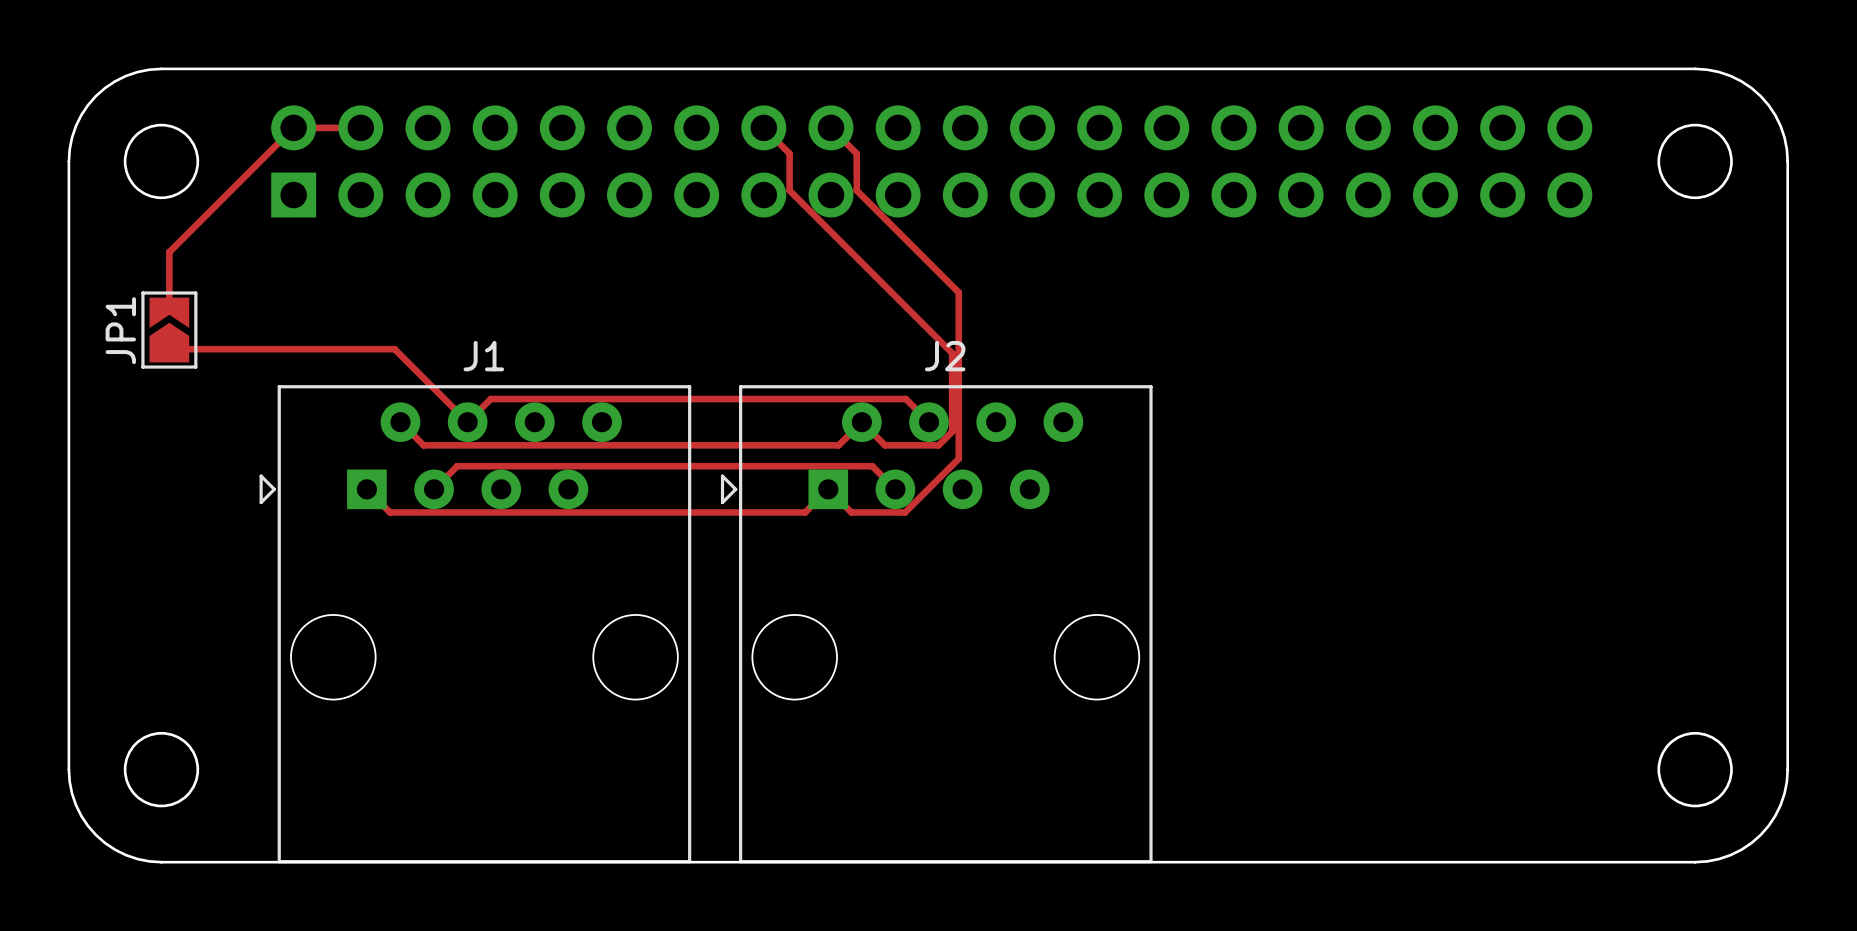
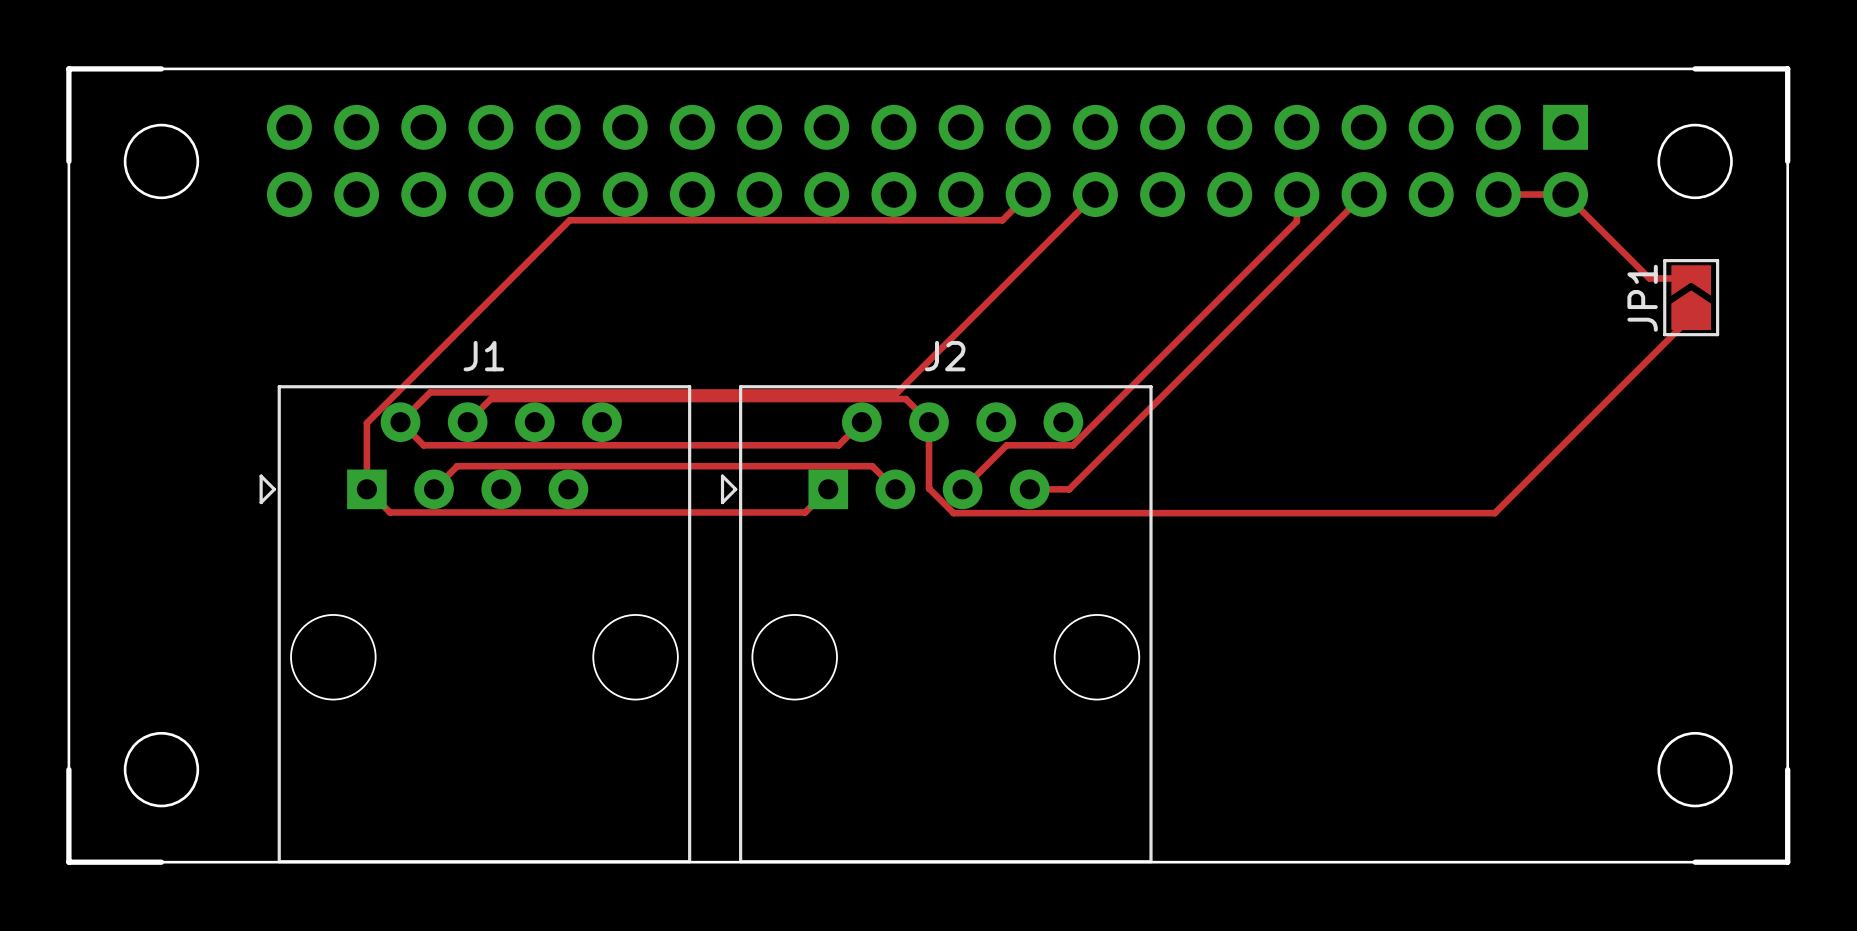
board edge: (161, 68) (137, 72) (126, 75) (115, 81) (96, 96) (81, 115) (75, 126) (72, 137) (68, 161) -> (161, 68) (68, 68) (68, 161)
board edge: (1695, 68) (1719, 72) (1730, 75) (1741, 81) (1760, 96) (1768, 105) (1780, 126) (1784, 137) (1787, 161) -> (1695, 68) (1787, 68) (1787, 161)
track: (360, 127) (293, 127) (169, 252) (169, 310) -> none
track: (763, 127) (789, 153) (789, 190) (952, 353) (952, 431) (938, 445) (884, 445) (861, 422) -> none
track: (830, 127) (856, 153) (856, 190) (958, 292) (958, 458) (905, 512) (851, 512) (828, 489) -> none
part rotation: 0° (931, 161) -> 180° (927, 160)
track: none -> (1028, 194) (1002, 220) (569, 220) (366, 423) (366, 489)
track: none -> (1095, 194) (897, 392) (430, 392) (400, 422)
track: none -> (1296, 194) (1296, 221) (1072, 445) (1006, 445) (962, 489)
track: none -> (1364, 194) (1069, 489) (1029, 489)
track: none -> (1498, 194) (1565, 194) (1649, 278) (1691, 278)
track: none -> (1691, 316) (1494, 513) (953, 513) (929, 488) (929, 422)
JP1 position: (169, 330) -> (1691, 297)
track: (169, 349) (394, 349) (467, 422) -> none
board edge: (68, 769) (72, 793) (75, 805) (88, 825) (96, 835) (105, 843) (126, 855) (137, 859) (161, 862) -> (68, 769) (68, 862) (161, 862)
board edge: (1787, 769) (1784, 793) (1780, 805) (1768, 825) (1760, 835) (1751, 843) (1730, 855) (1719, 859) (1695, 862) -> (1787, 769) (1787, 862) (1695, 862)

